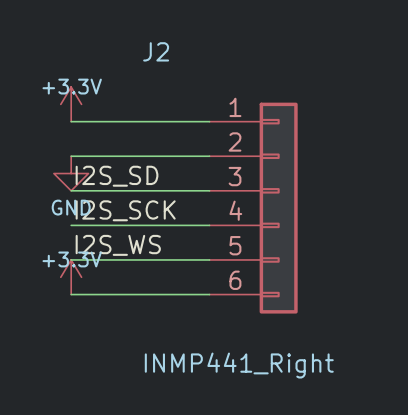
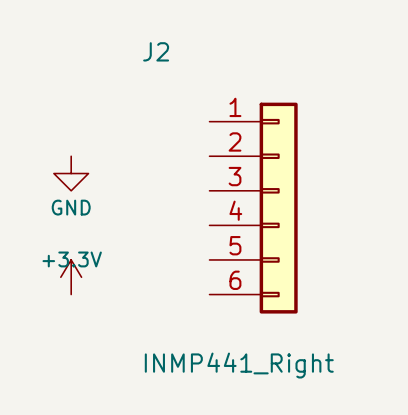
power symbol: +3.3V (71, 104) -> none
wire: (71, 121) (209, 121) -> none
wire: (71, 156) (209, 156) -> none
label: I2S_SD (117, 176) -> none
wire: (71, 190) (209, 190) -> none
label: I2S_SCK (125, 210) -> none
wire: (71, 225) (209, 225) -> none
label: I2S_WS (118, 245) -> none
wire: (71, 259) (209, 259) -> none
wire: (71, 294) (209, 294) -> none

